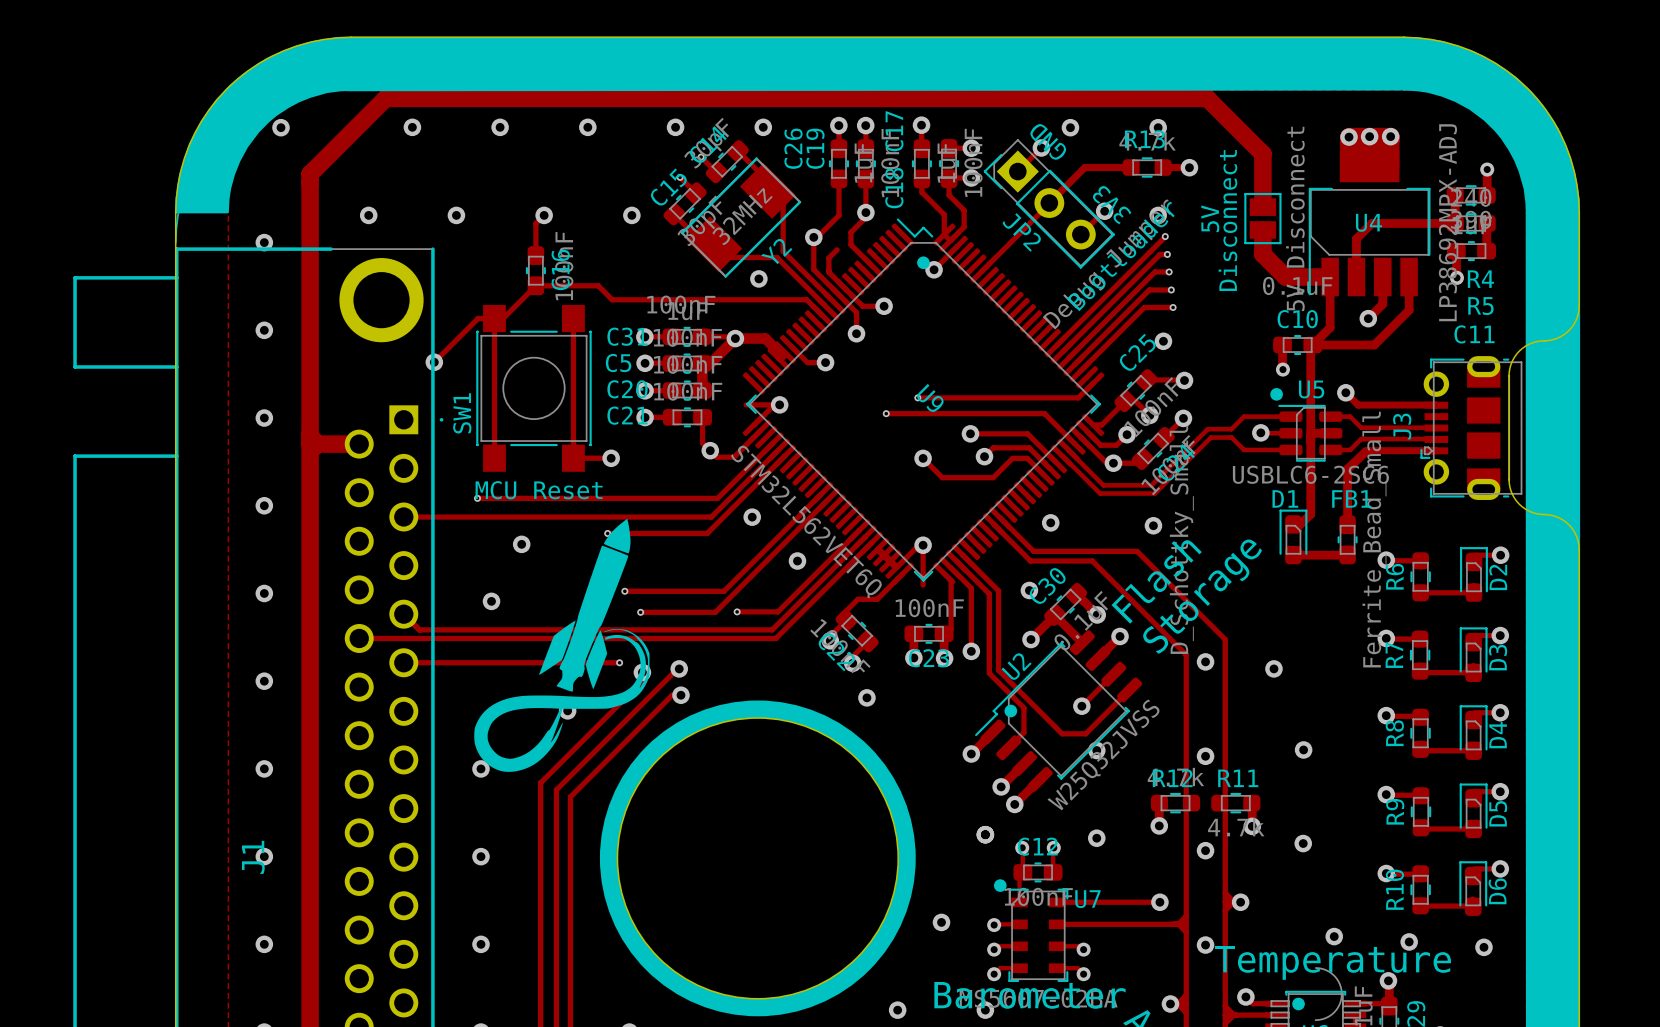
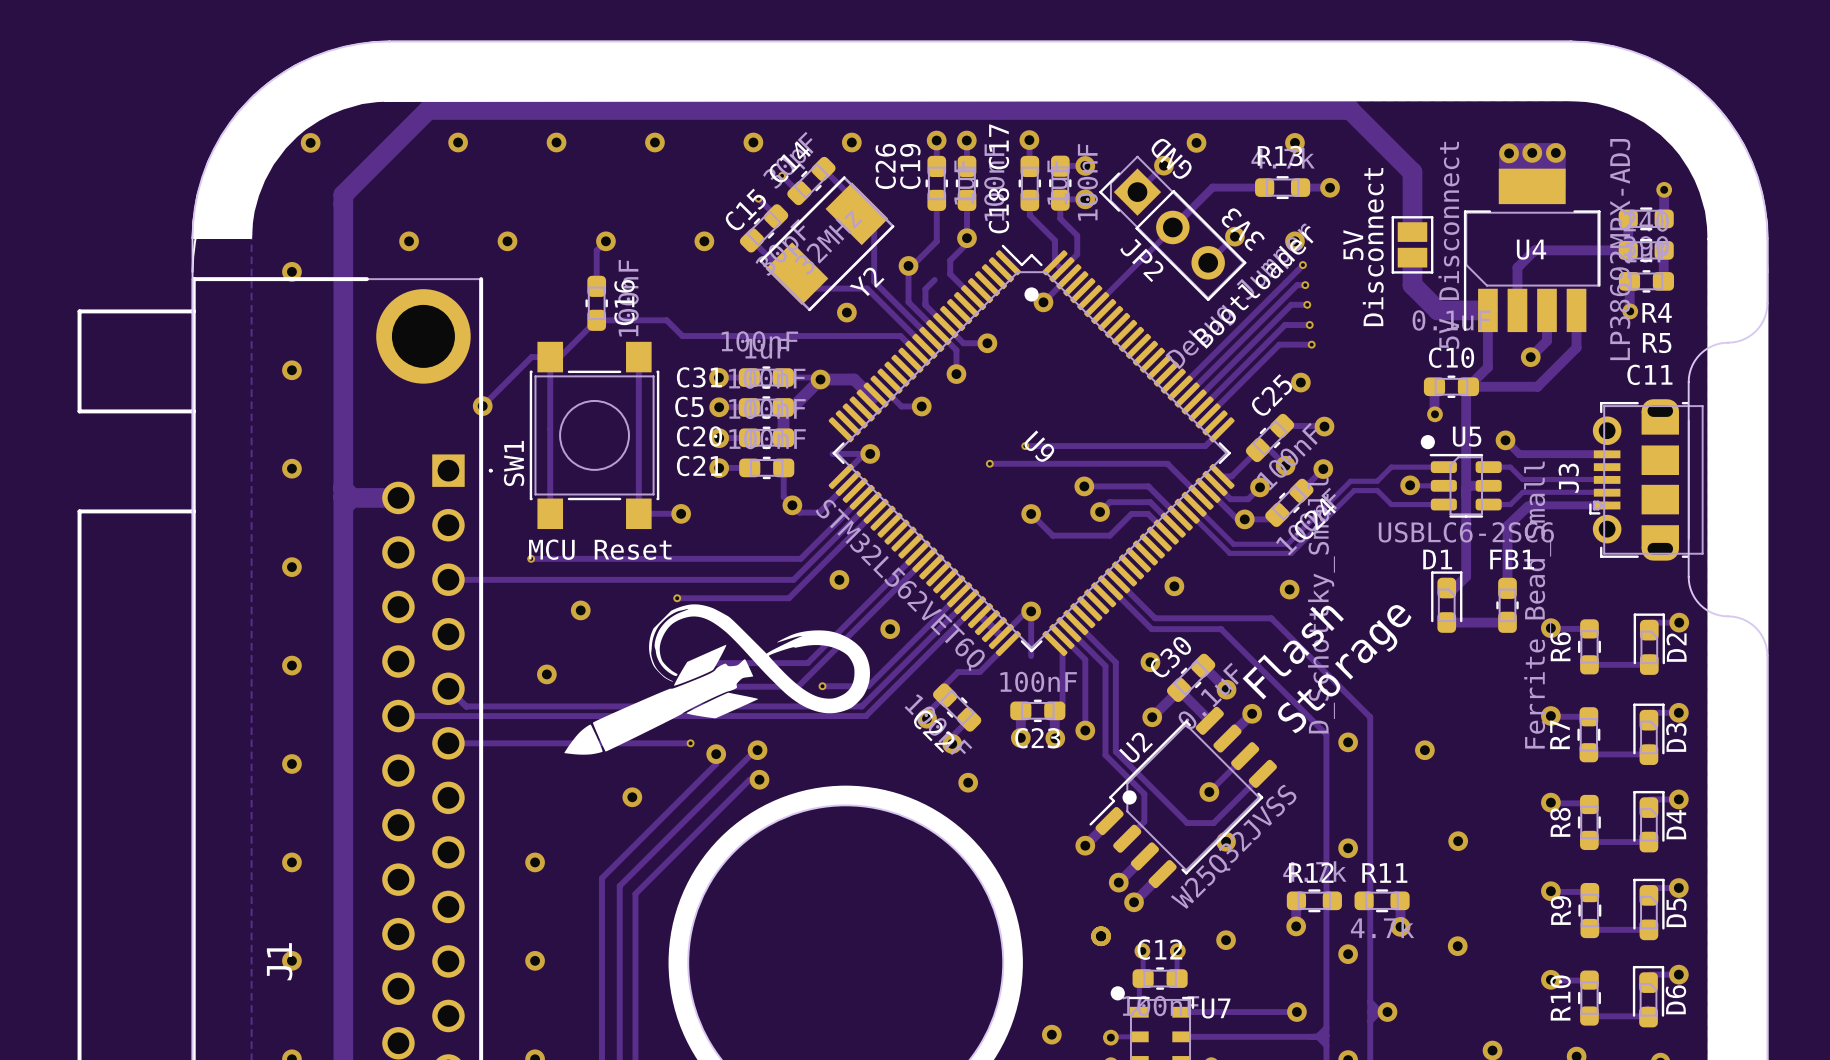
board edge: (1579, 270) (1579, 309) (1573, 324) (1559, 337) (1532, 342) (1522, 348) (1512, 360) (1509, 375) -> (1767, 303) (1763, 320) (1752, 334) (1741, 340) (1710, 346) (1694, 361) (1688, 377) (1688, 421)
board edge: (1509, 479) (1512, 494) (1522, 506) (1532, 512) (1557, 517) (1565, 521) (1574, 532) (1578, 545) (1579, 584) -> (1688, 537) (1688, 581) (1694, 597) (1710, 612) (1738, 617) (1752, 624) (1762, 636) (1767, 655)
drawing: [474, 518, 650, 772] -> none
drawing: none -> [564, 604, 870, 755]

